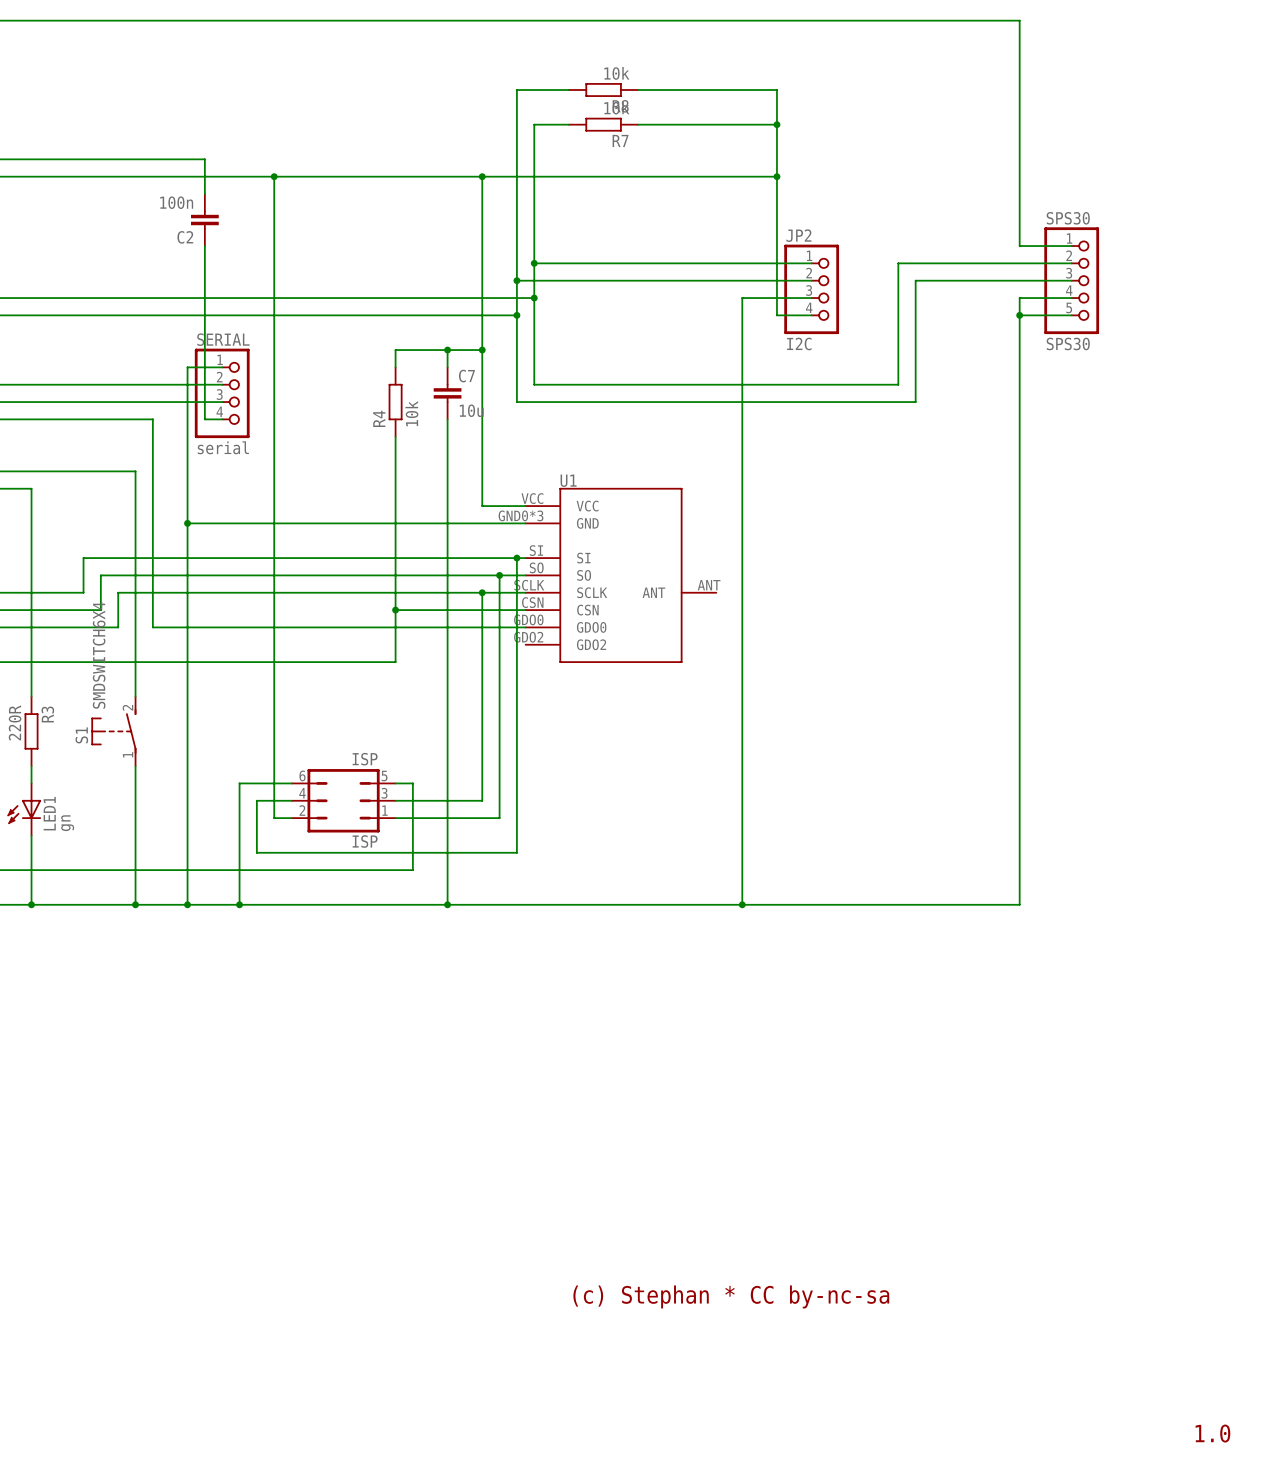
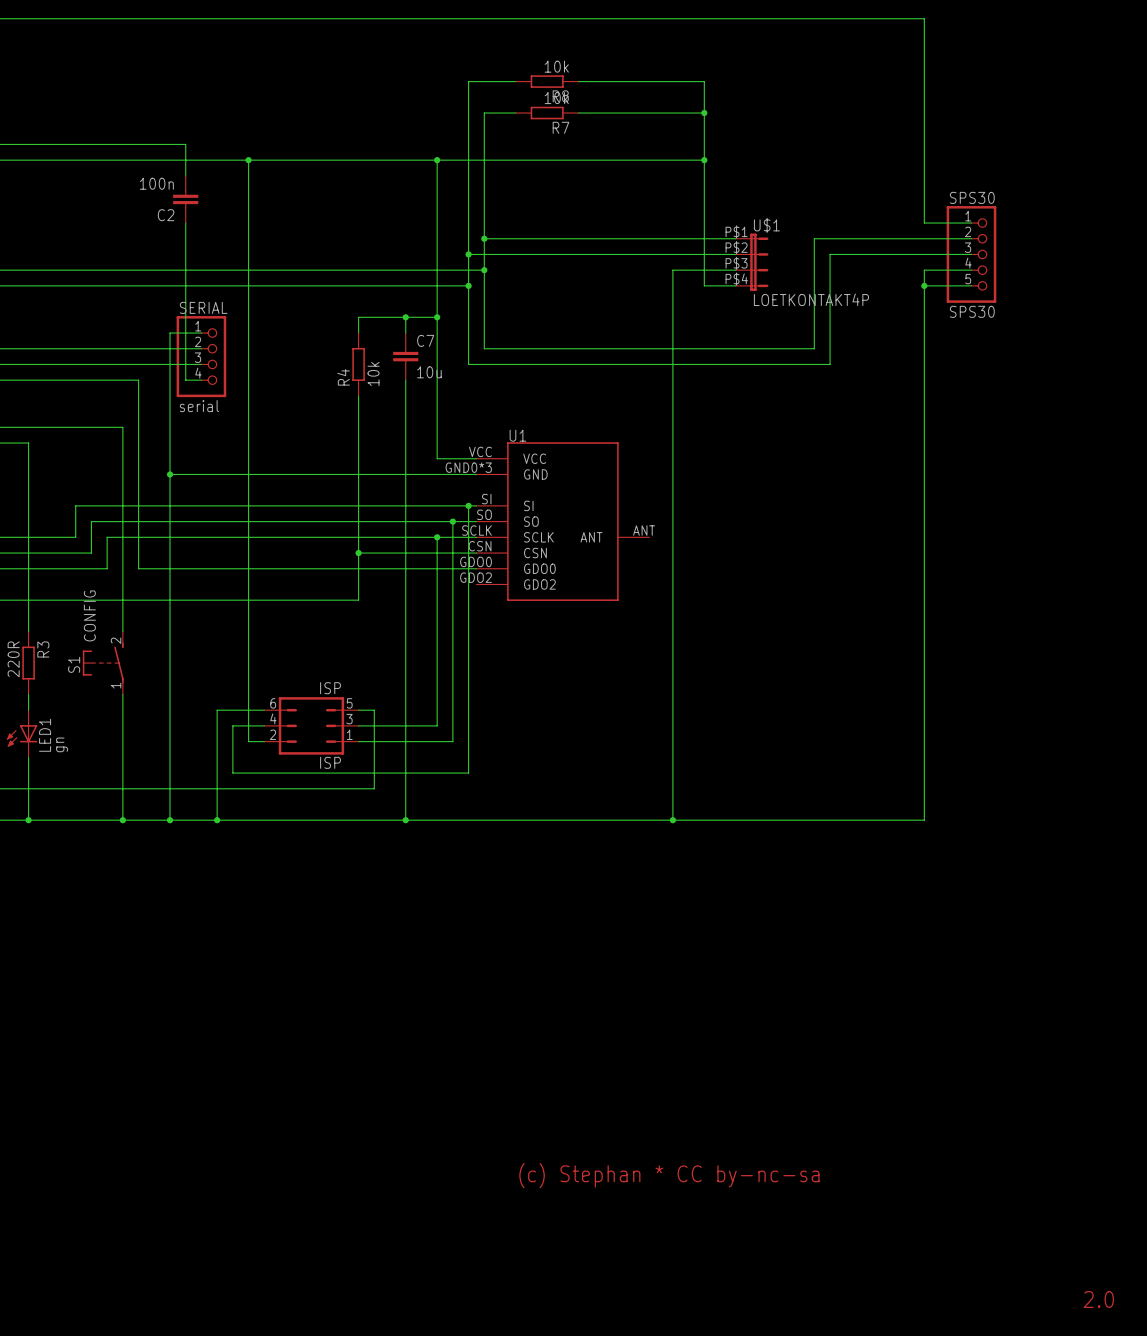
JP2: I2C (811, 289) -> none
U$1: none -> LOETKONTAKT4P (752, 262)
S1 value: SMDSWITCH6X4 (99, 655) -> CONFIG (89, 615)
text: 1.0 (1212, 1433) -> 2.0 (1098, 1299)

